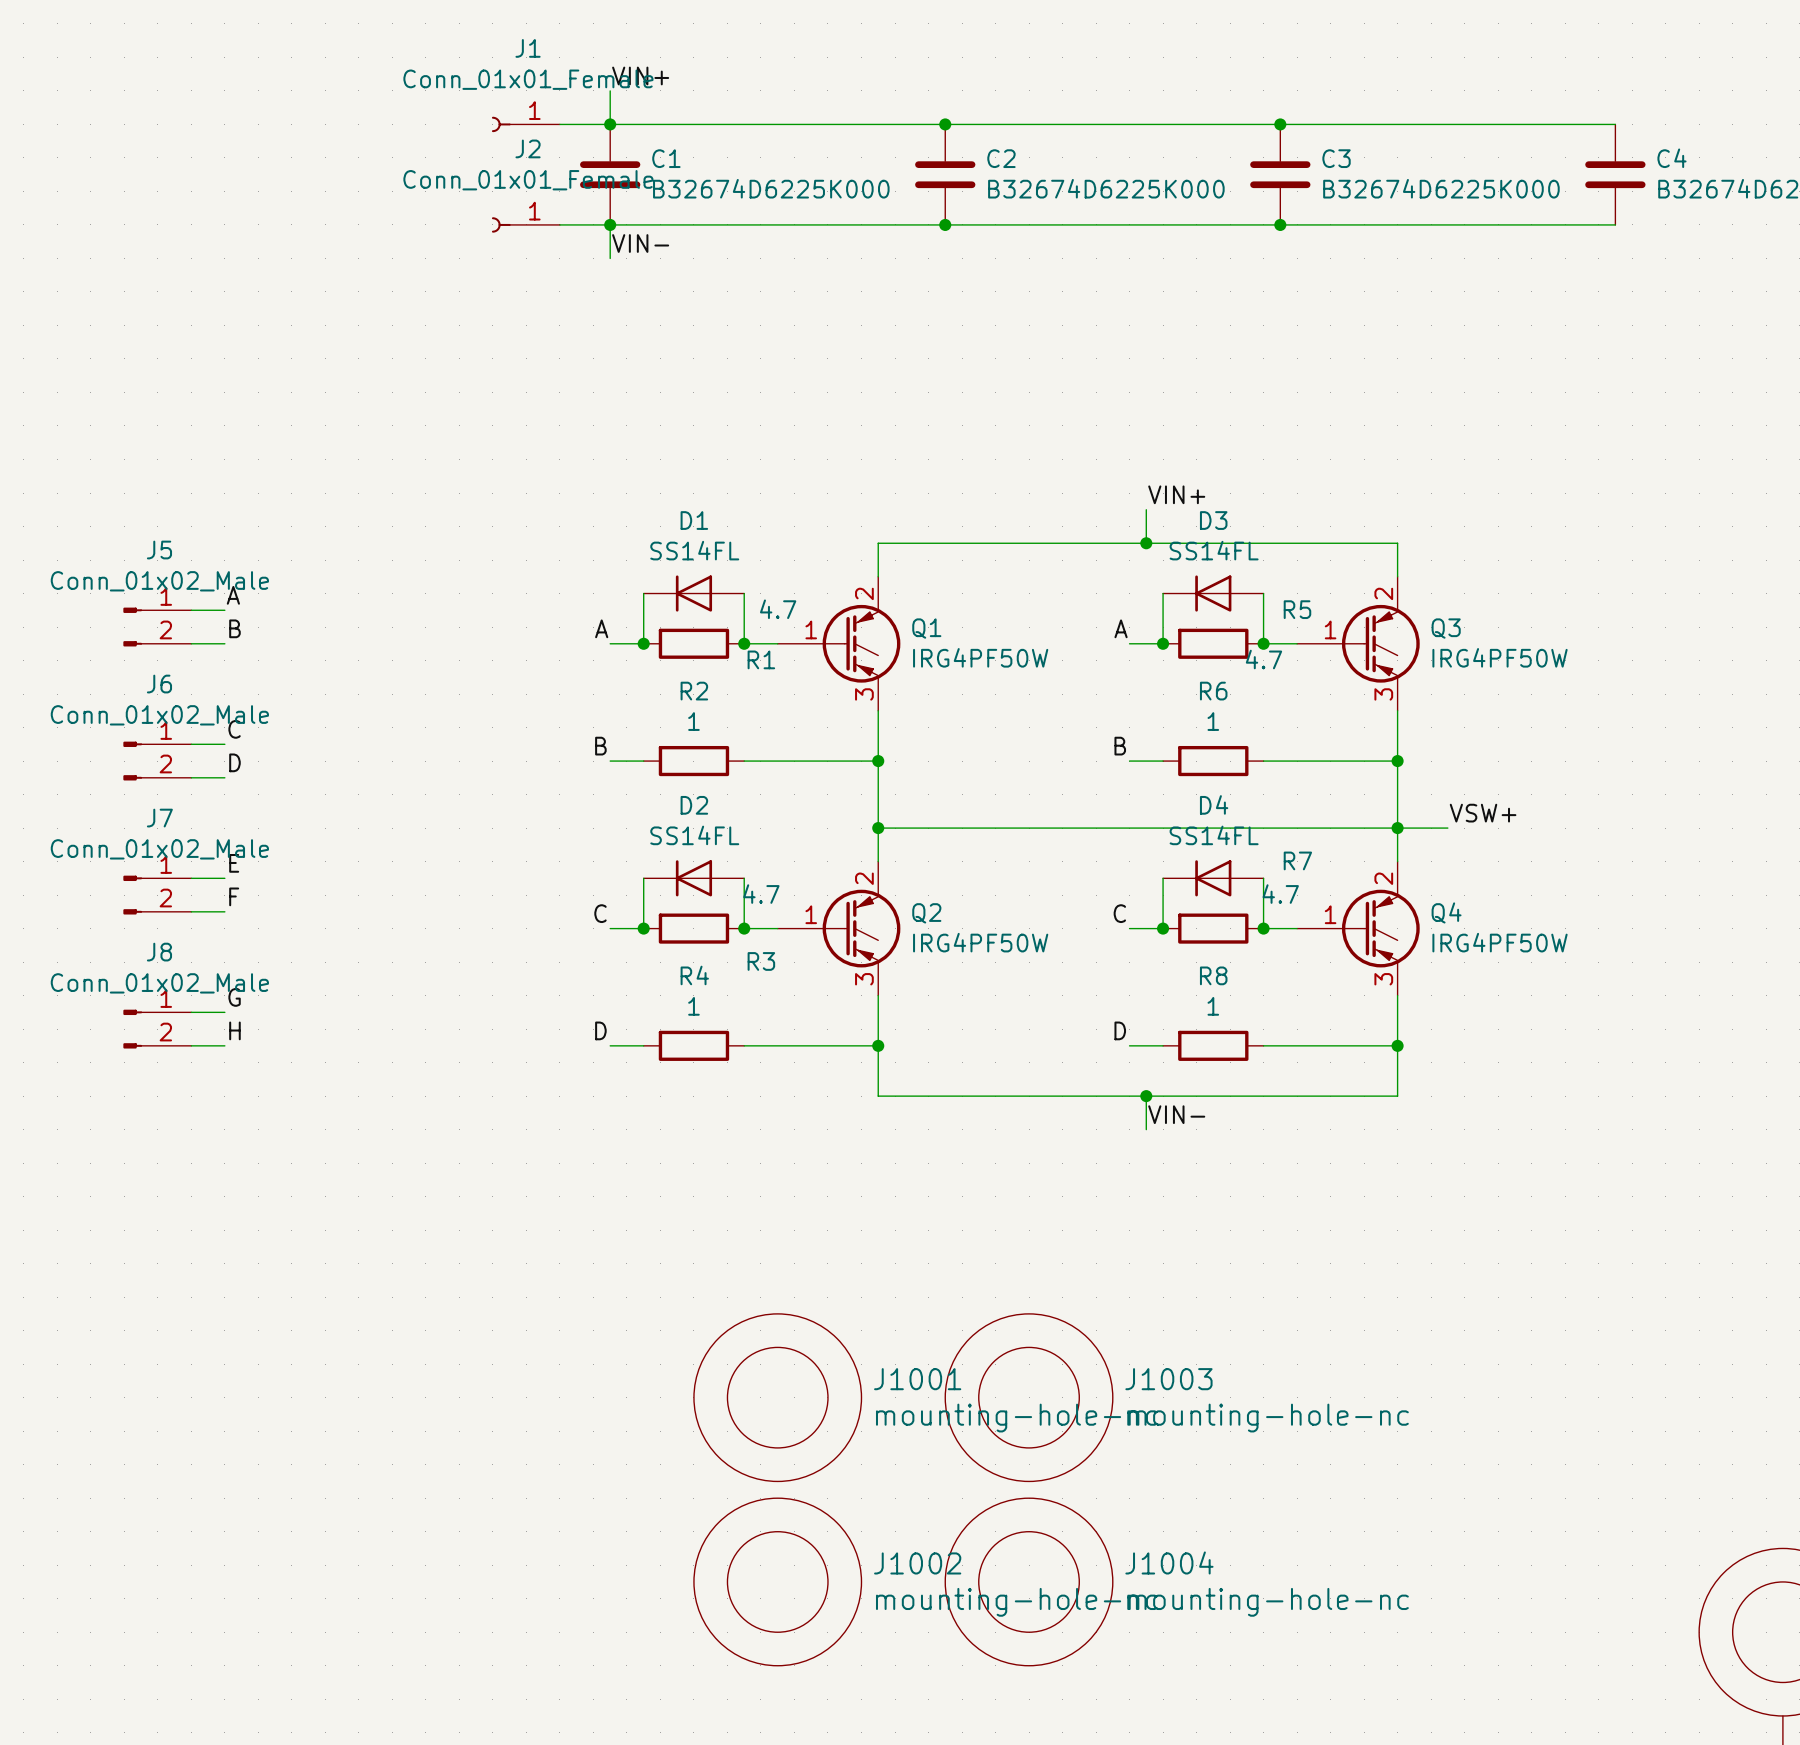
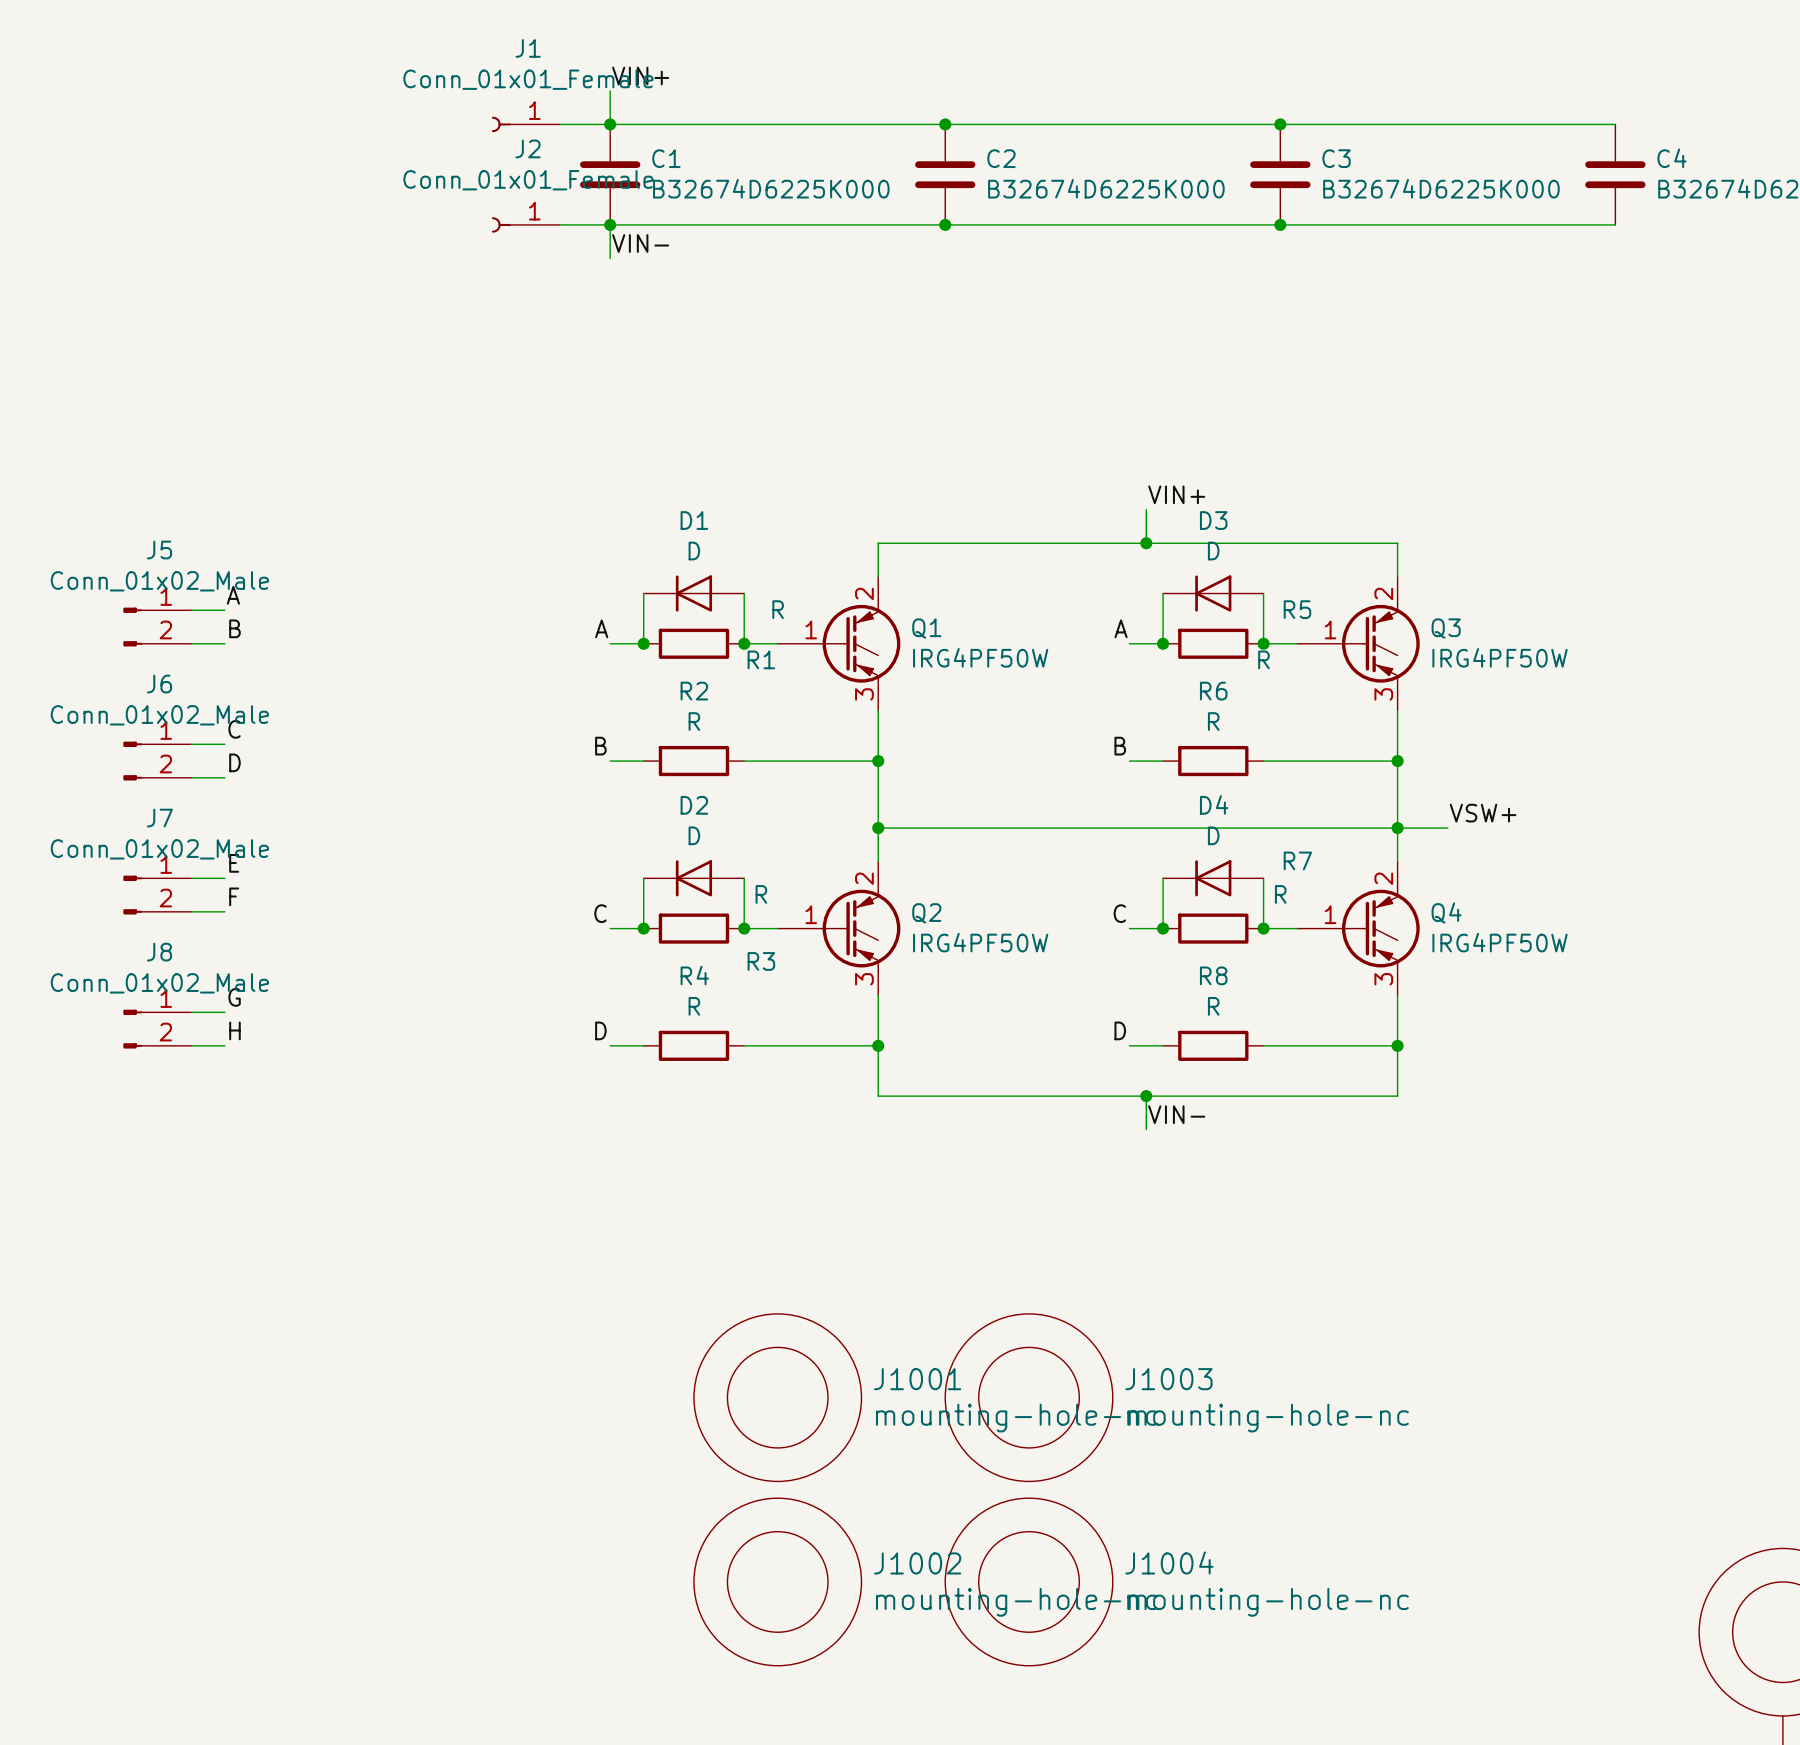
D1 value: SS14FL (694, 550) -> D (694, 551)
D3 value: SS14FL (1214, 550) -> D (1213, 551)
R1 value: 4.7 (778, 609) -> R (778, 609)
R5 value: 4.7 (1263, 659) -> R (1263, 659)
R2 value: 1 (693, 721) -> R (694, 721)
R6 value: 1 (1213, 721) -> R (1213, 721)
D2 value: SS14FL (694, 835) -> D (694, 835)
D4 value: SS14FL (1214, 835) -> D (1213, 835)
R3 value: 4.7 (761, 894) -> R (761, 894)
R7 value: 4.7 (1280, 894) -> R (1280, 894)
R4 value: 1 (693, 1006) -> R (694, 1006)
R8 value: 1 (1213, 1006) -> R (1213, 1006)

